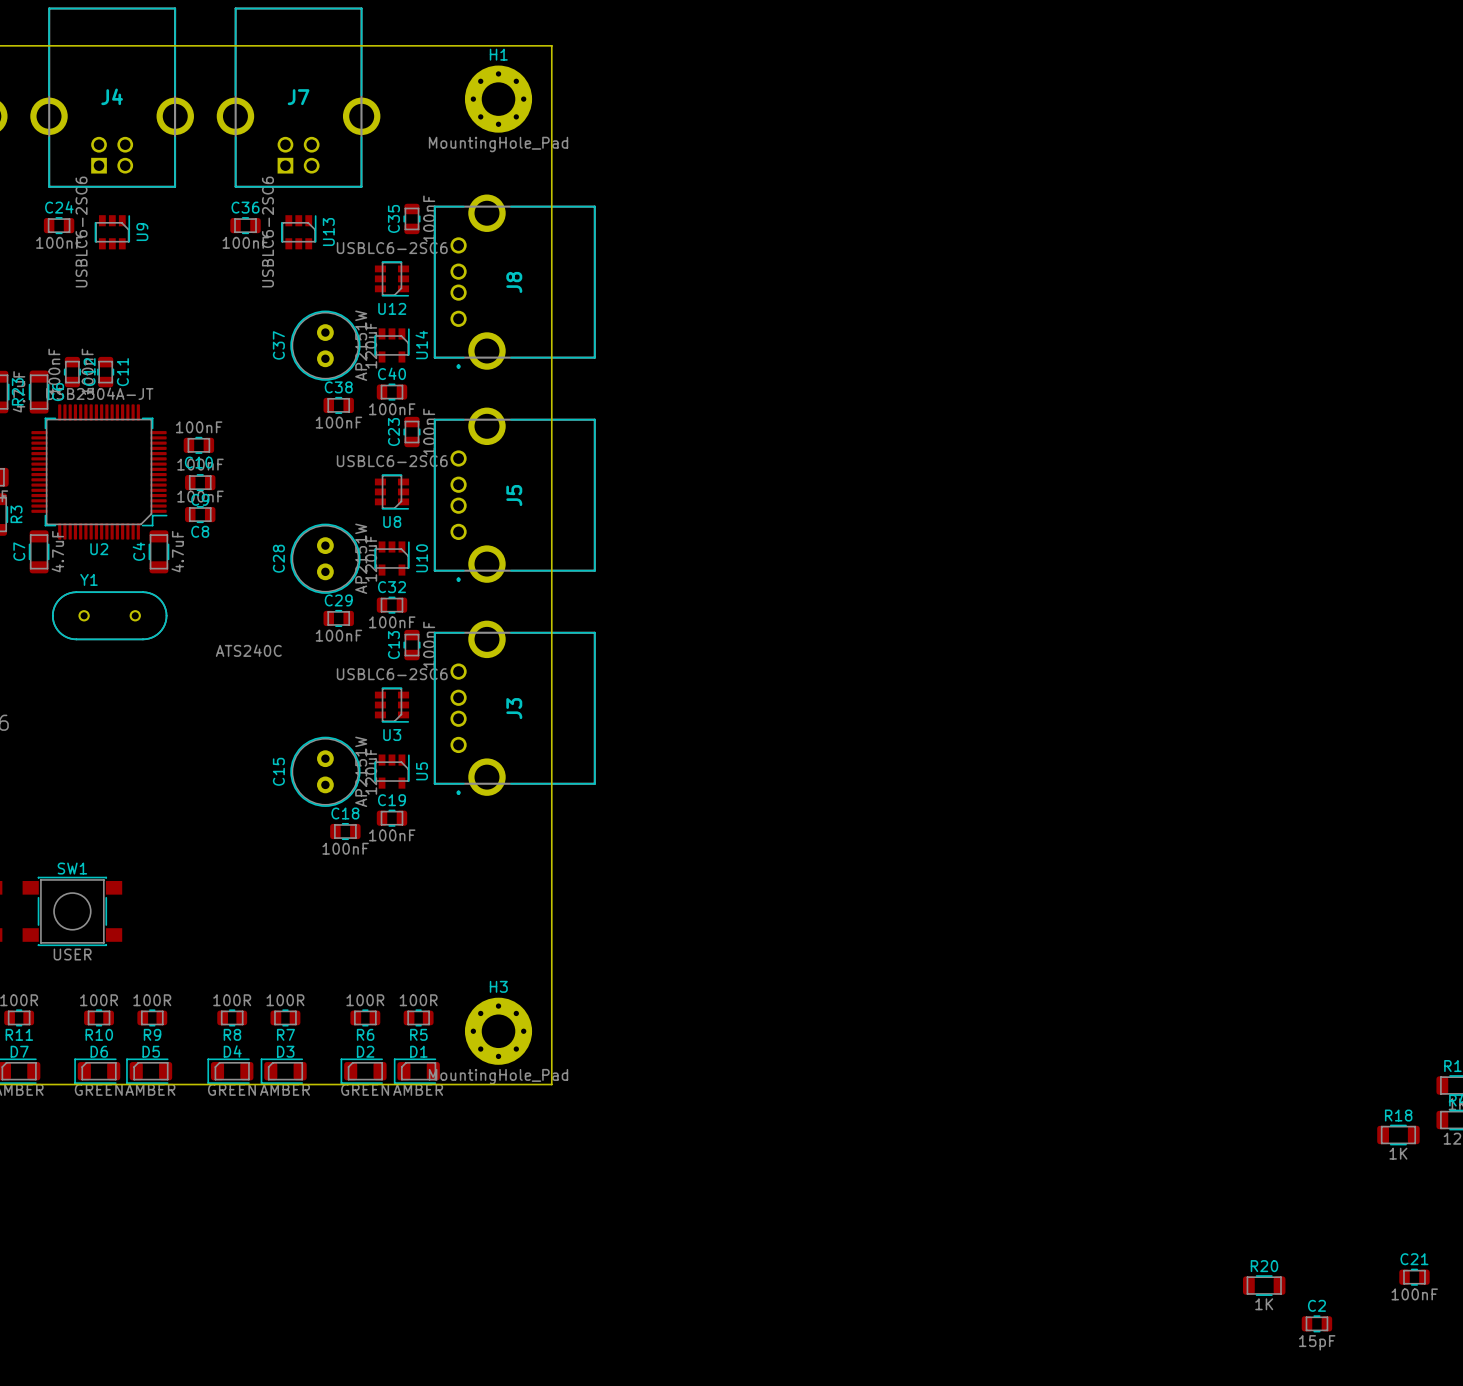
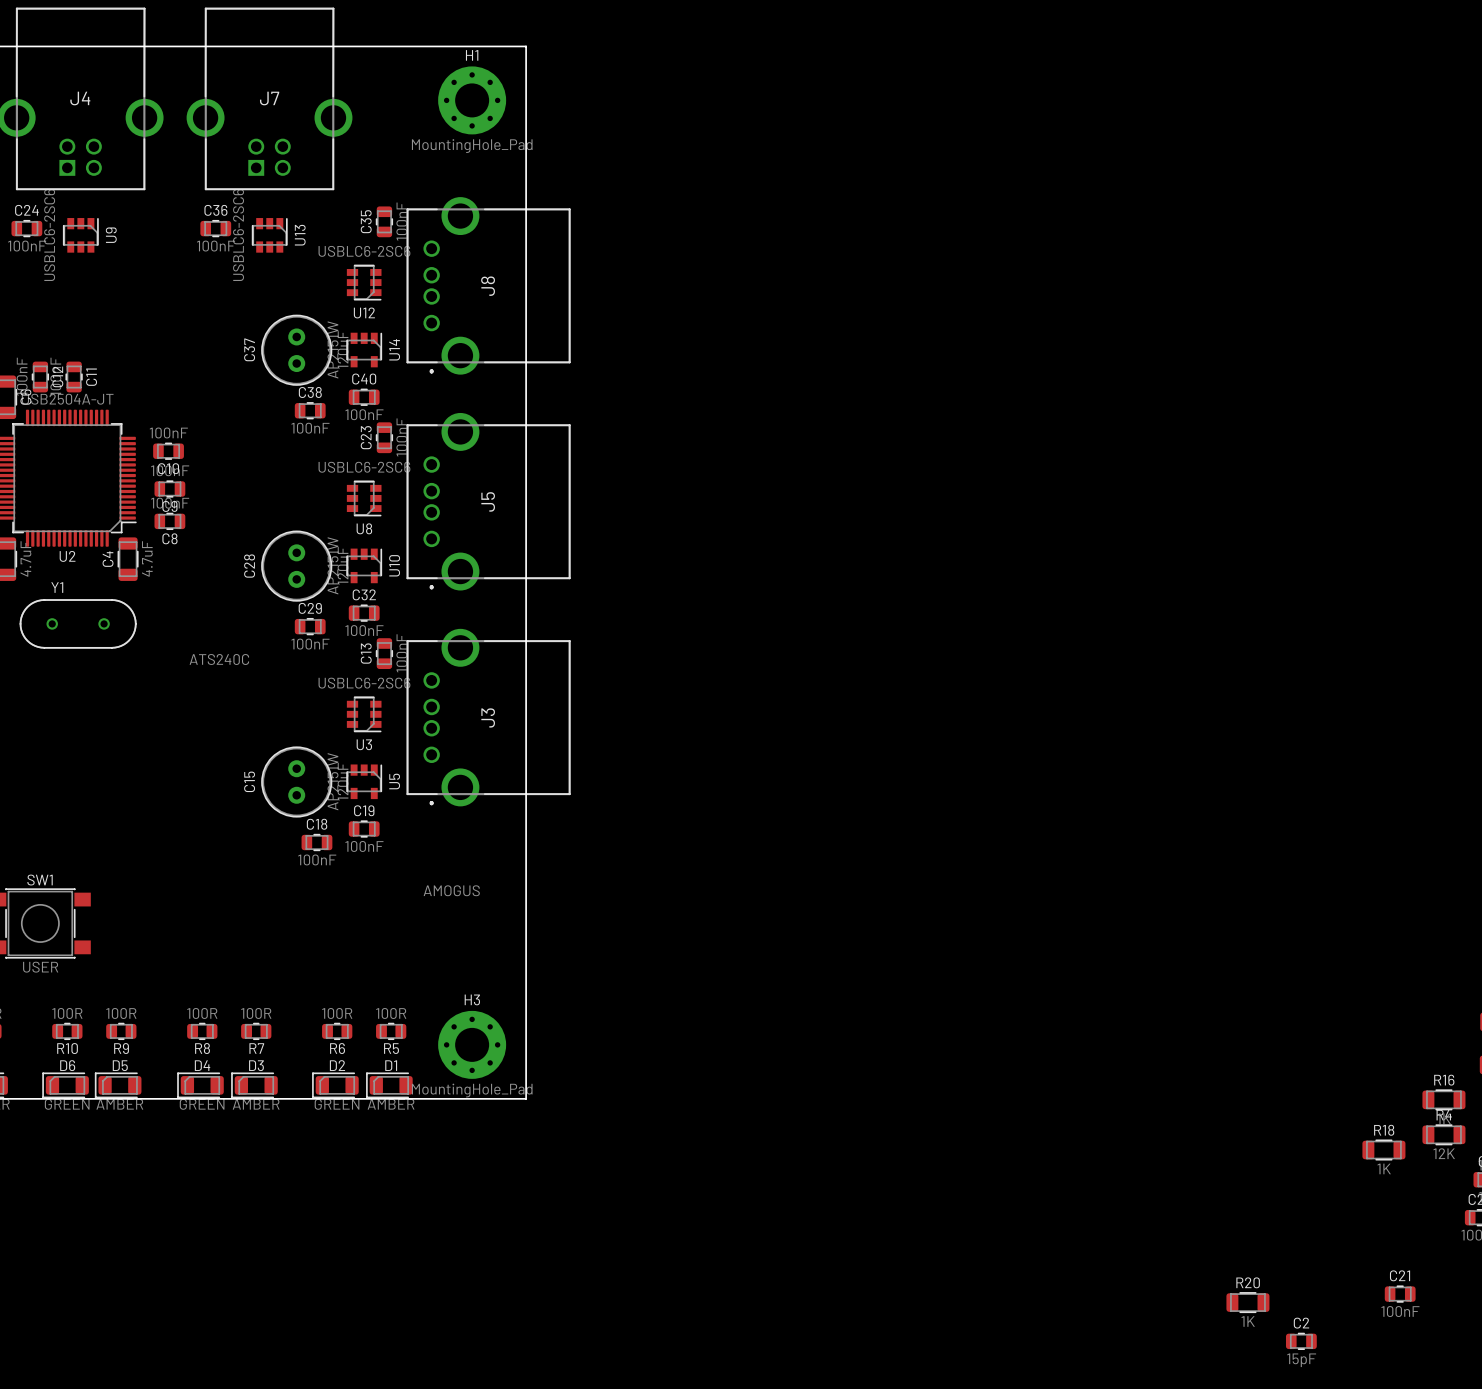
drawing: none -> [423, 885, 480, 897]

